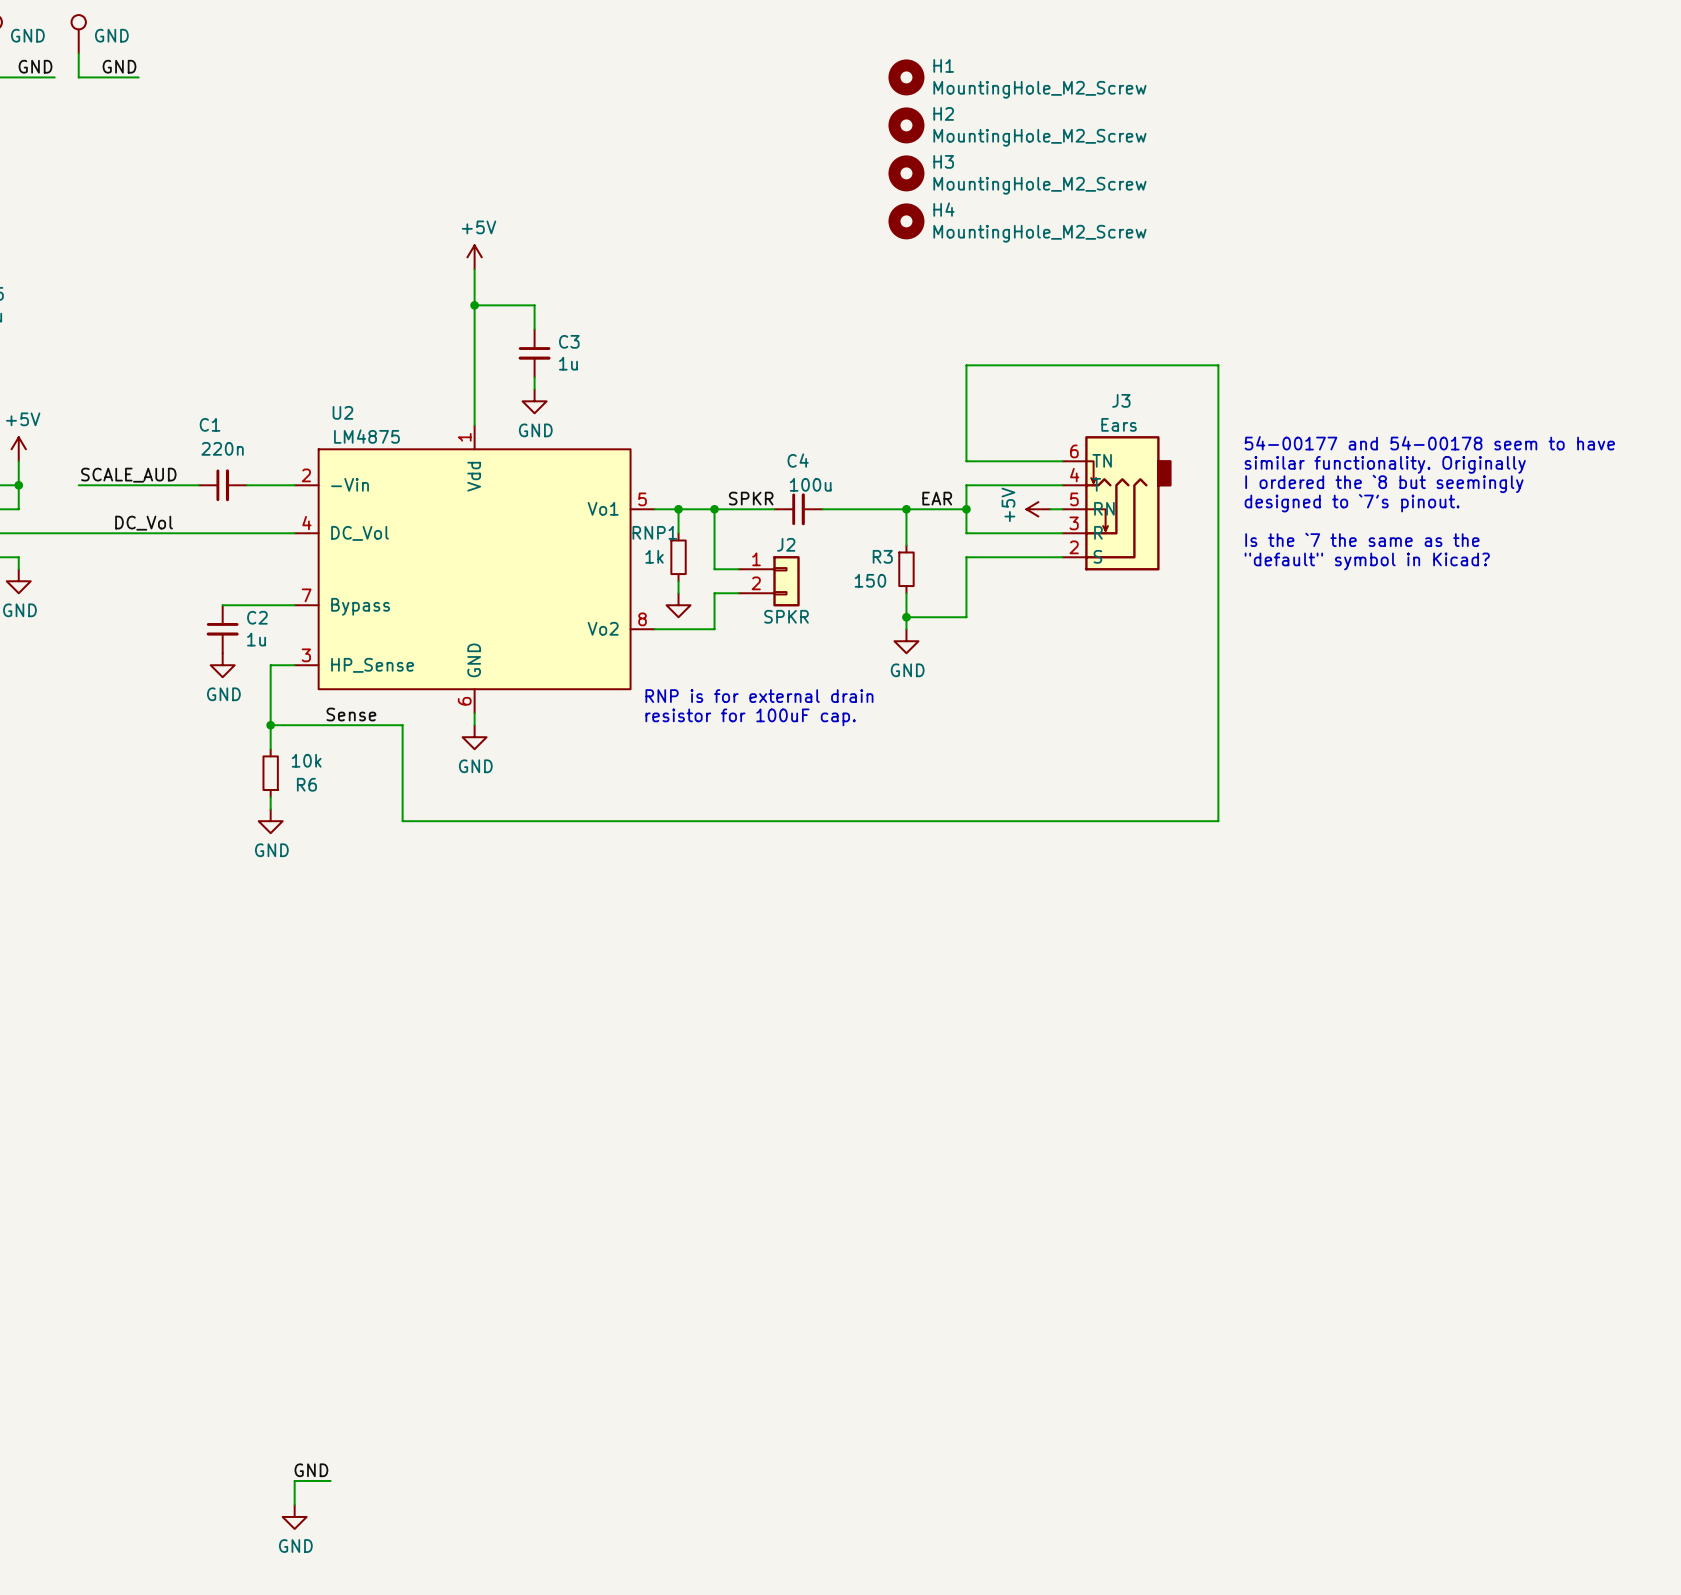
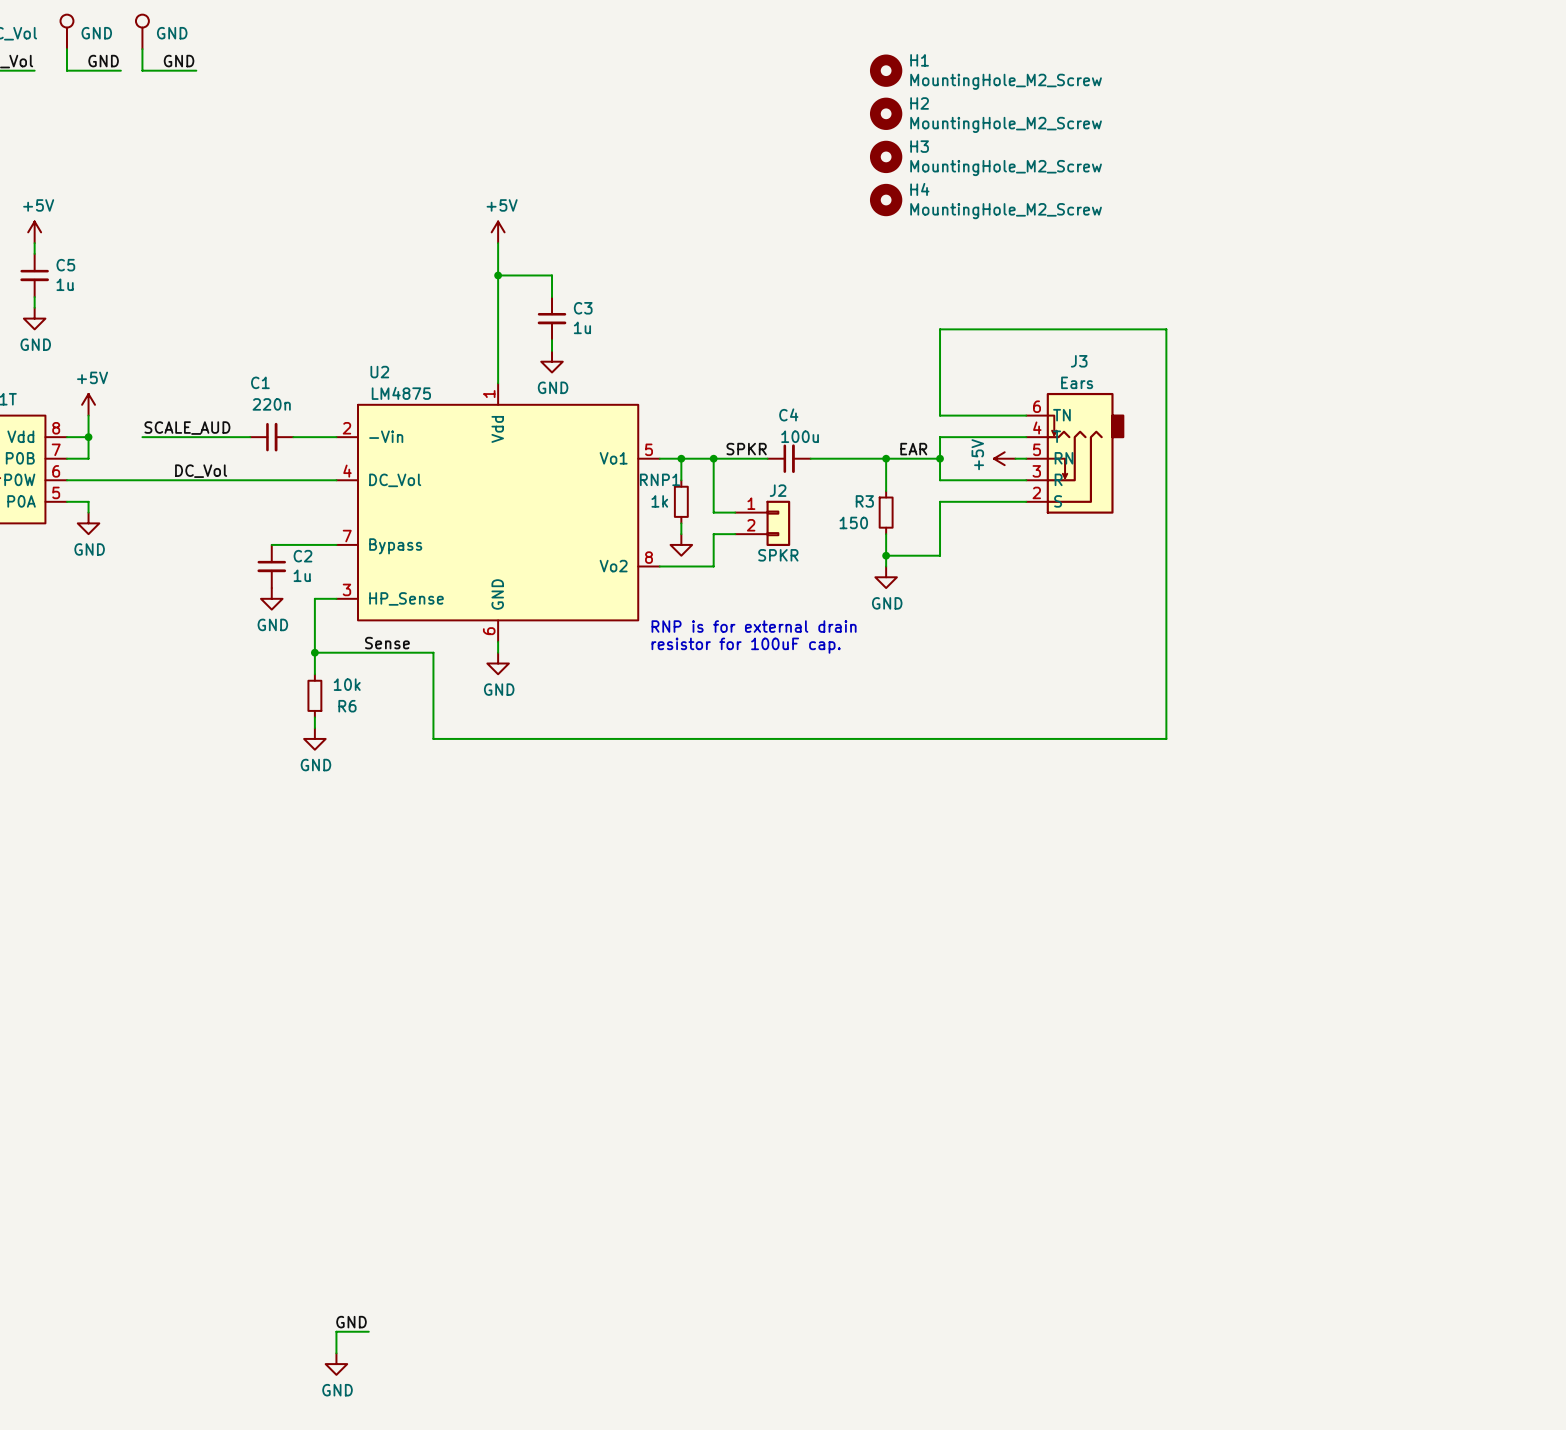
text: 54-00177 and 54-00178 seem to have (1429, 443) -> none
text: similar functionality. Originally (1385, 464) -> none
text: I ordered the `8 but seemingly (1384, 483) -> none
text: designed to `7's pinout. (1352, 503) -> none
text: Is the `7 the same as the (1362, 539) -> none
text: "default" symbol in Kicad? (1367, 561) -> none

